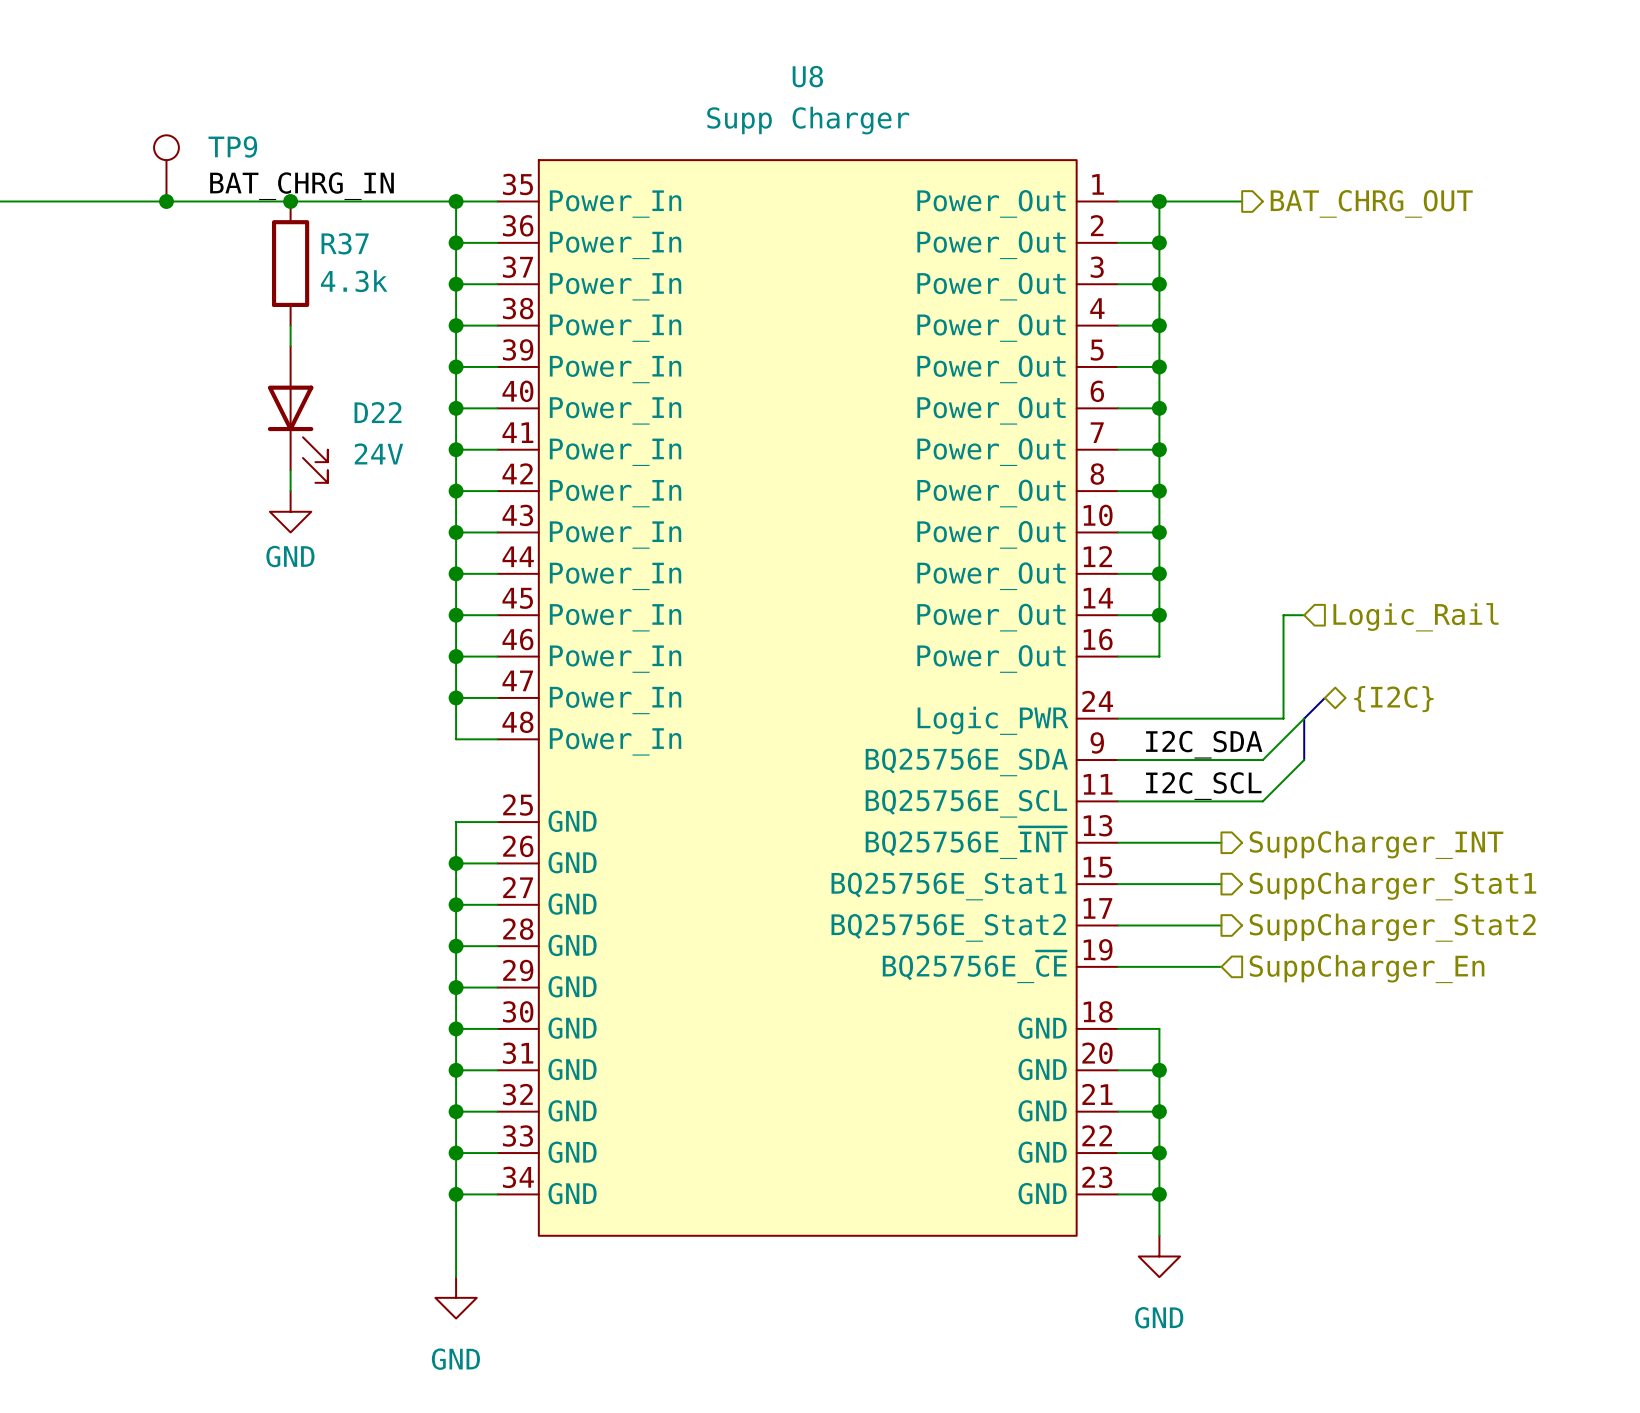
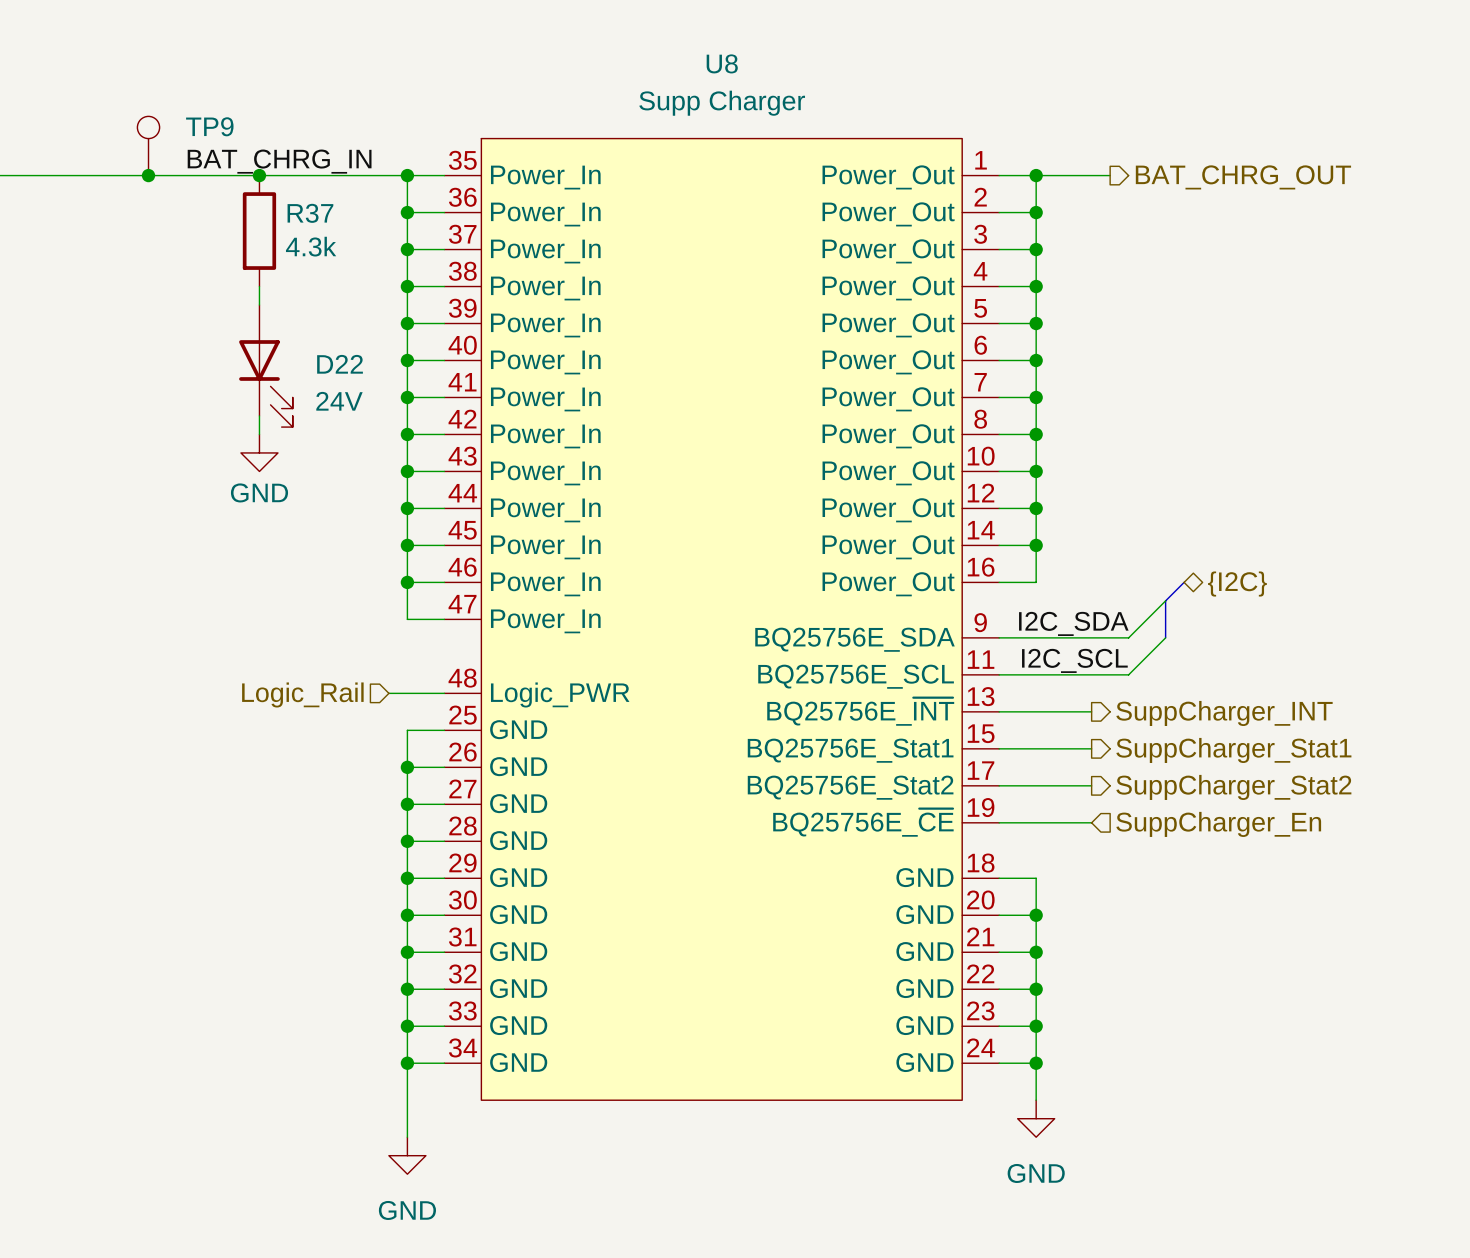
U8 symbol: [497, 160, 1119, 1236] -> [444, 138, 1000, 1101]
wire: (1304, 615) (1283, 615) (1283, 718) (1262, 718) -> (1165, 600) (1128, 637)
hierarchical label: Logic_Rail (1416, 617) -> none
wire: (456, 697) (456, 739) (497, 739) -> none
junction: (456, 697) -> none
bus: (1324, 697) (1304, 718) (1304, 760) -> (1184, 582) (1165, 600) (1165, 637)
hierarchical label position: {I2C} (1393, 699) -> {I2C} (1237, 584)
label: none -> I2C_SDA (1073, 623)
label: I2C_SDA (1204, 744) -> I2C_SCL (1074, 660)
wire: (1304, 760) (1262, 801) (1221, 801) -> none
wire: none -> (388, 693) (444, 693)
hierarchical label: none -> Logic_Rail (302, 694)
label: I2C_SCL (1203, 786) -> none
hierarchical label: none -> SuppCharger_INT (1224, 713)
hierarchical label: SuppCharger_INT (1376, 844) -> SuppCharger_Stat1 (1233, 750)
hierarchical label: SuppCharger_Stat1 (1392, 886) -> SuppCharger_Stat2 (1233, 787)
hierarchical label shape: output (1392, 927) -> input (1218, 824)
hierarchical label: SuppCharger_Stat2 (1392, 927) -> SuppCharger_En (1218, 824)
wire: (1118, 966) (1221, 966) -> none
hierarchical label: SuppCharger_En (1367, 969) -> none
wire: none -> (999, 878) (1036, 878) (1036, 915)
junction: none -> (1036, 915)

